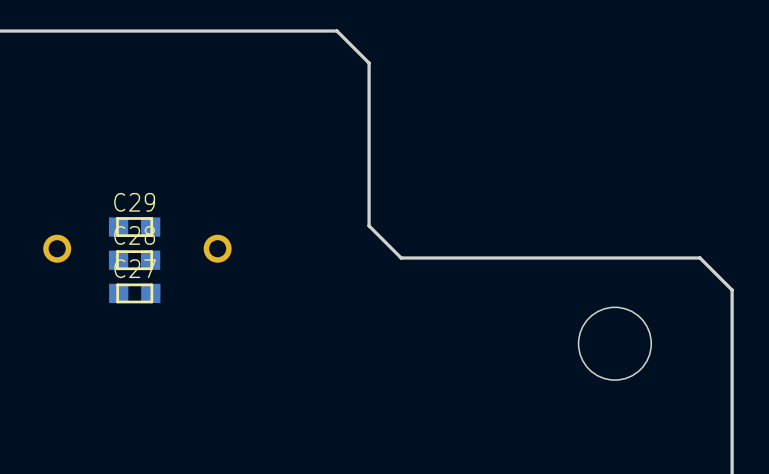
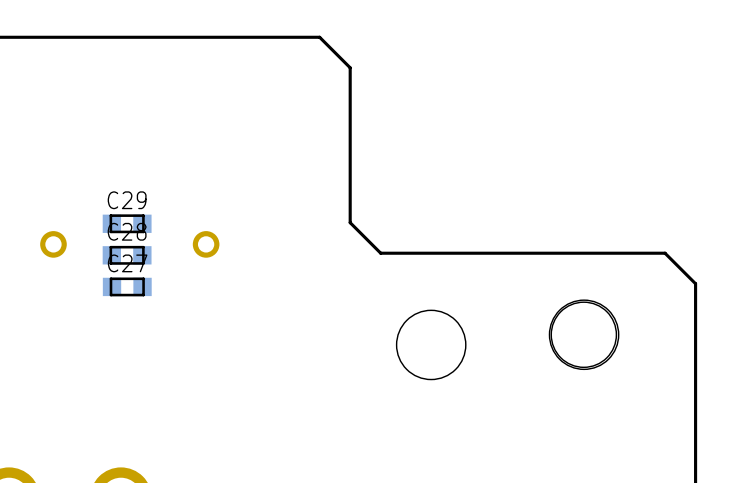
round board edge: none -> [551, 302, 617, 368]
round board edge: none -> [396, 310, 466, 380]

